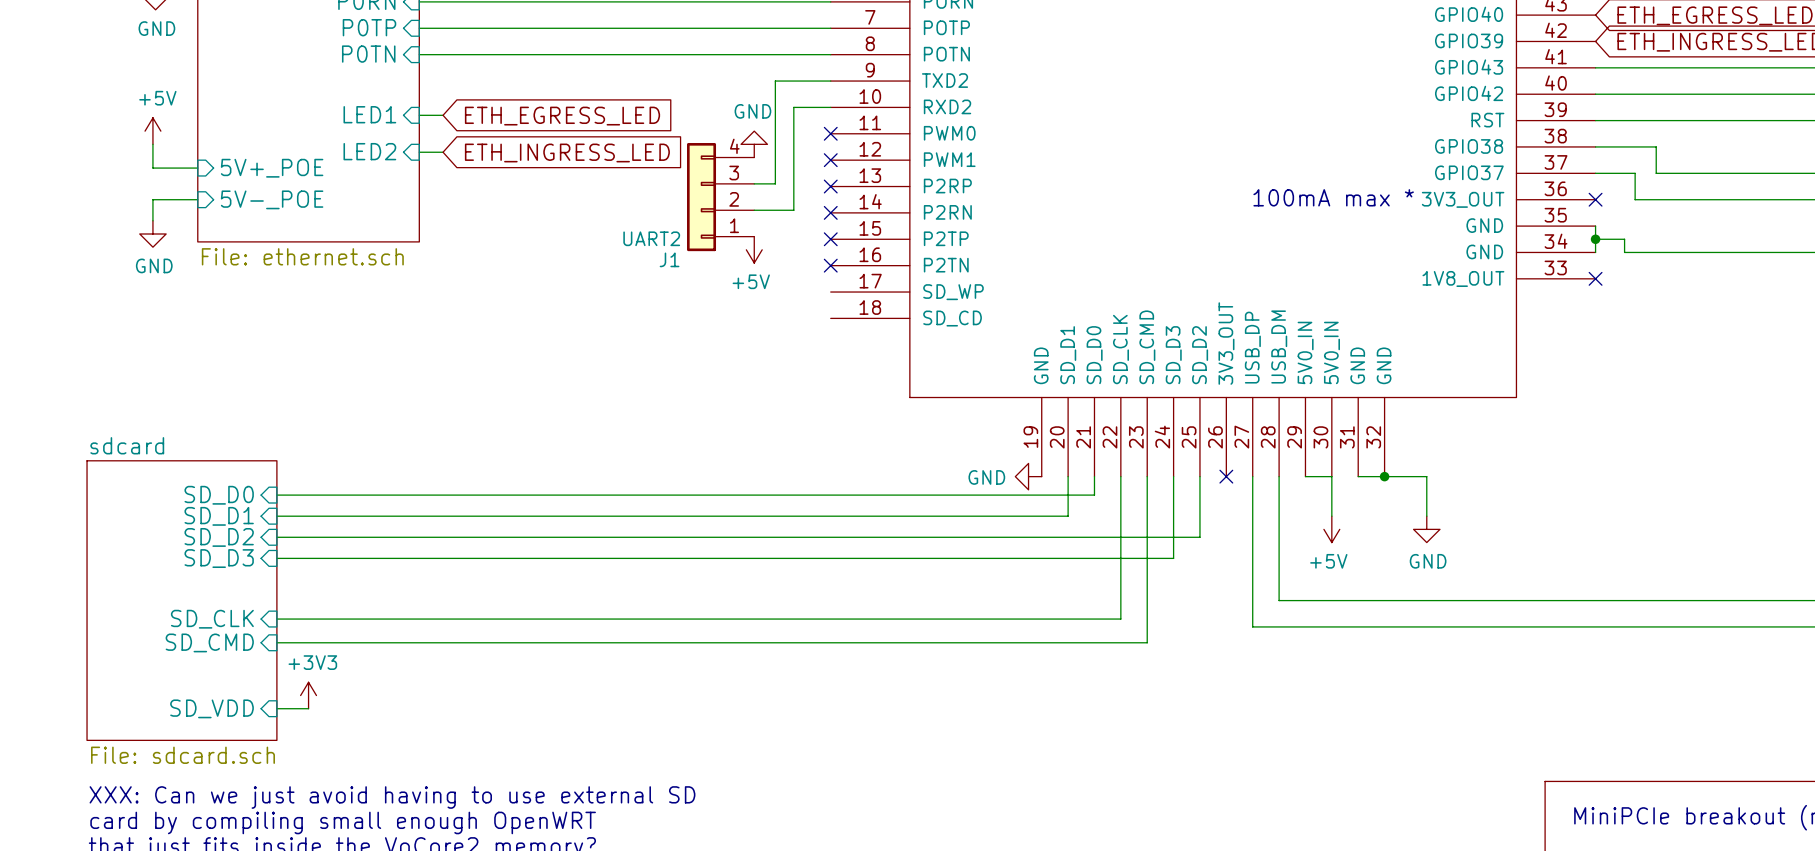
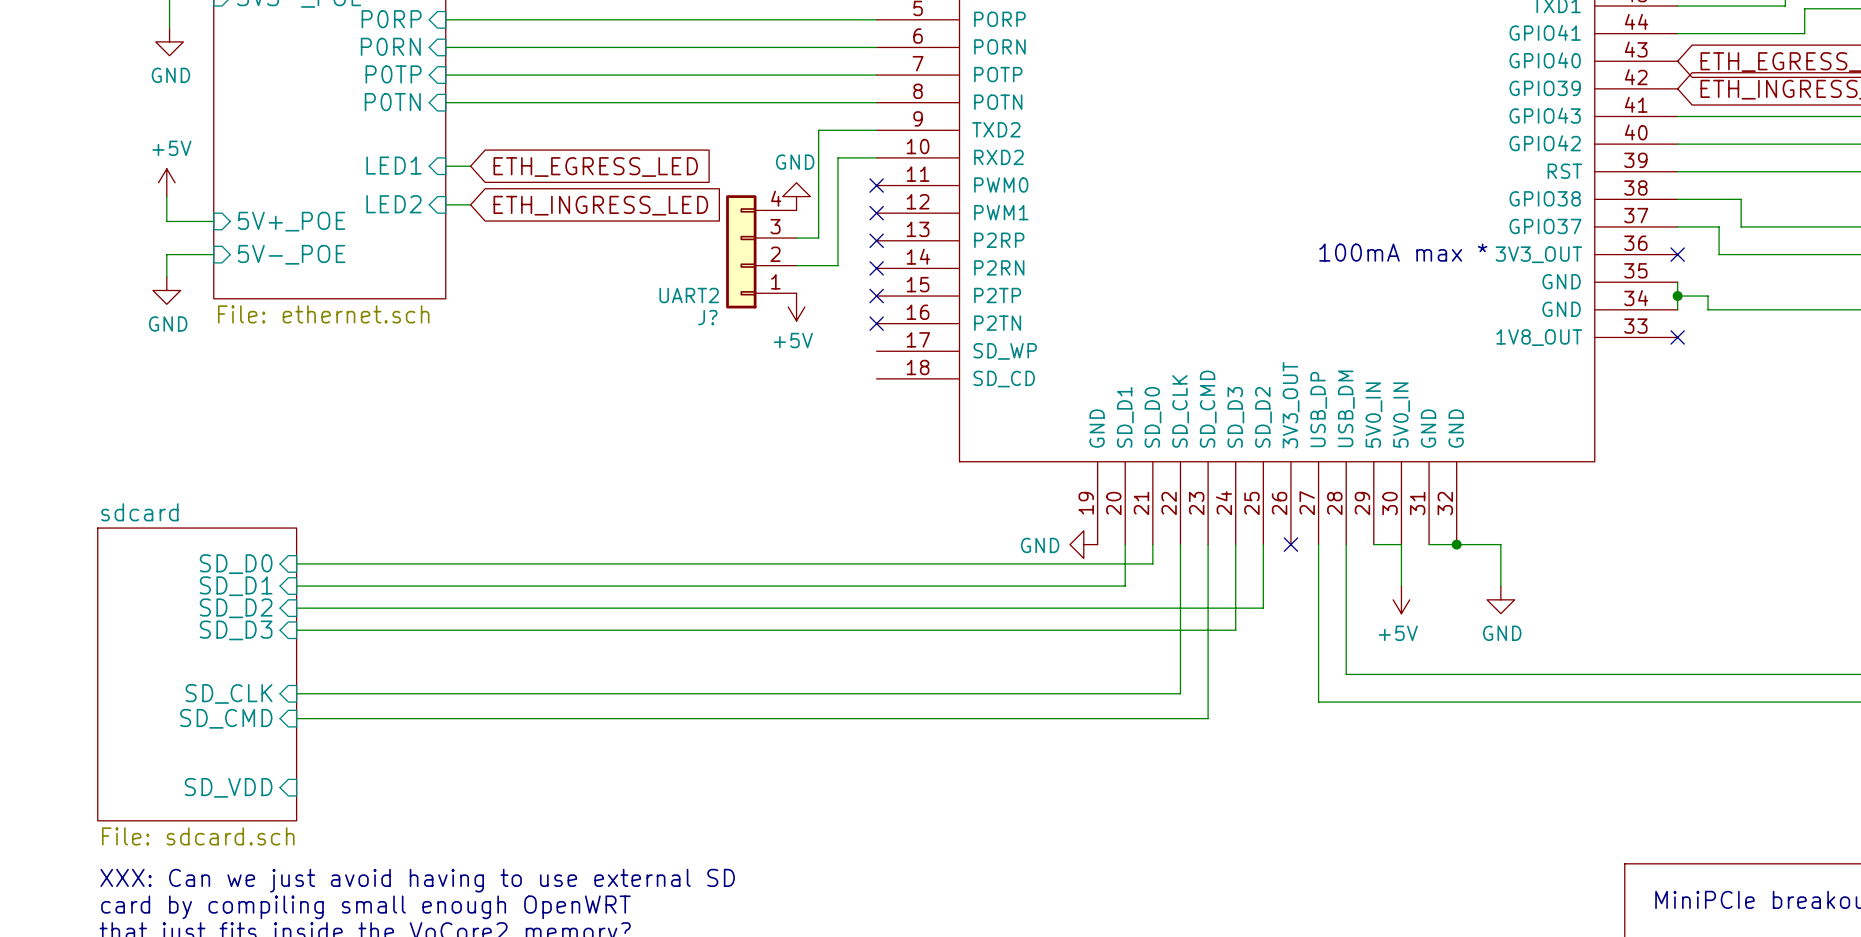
J1 name: J1 (669, 259) -> J? (707, 317)
power symbol: +3V3 (308, 695) -> none
wire: (276, 708) (308, 708) -> none

